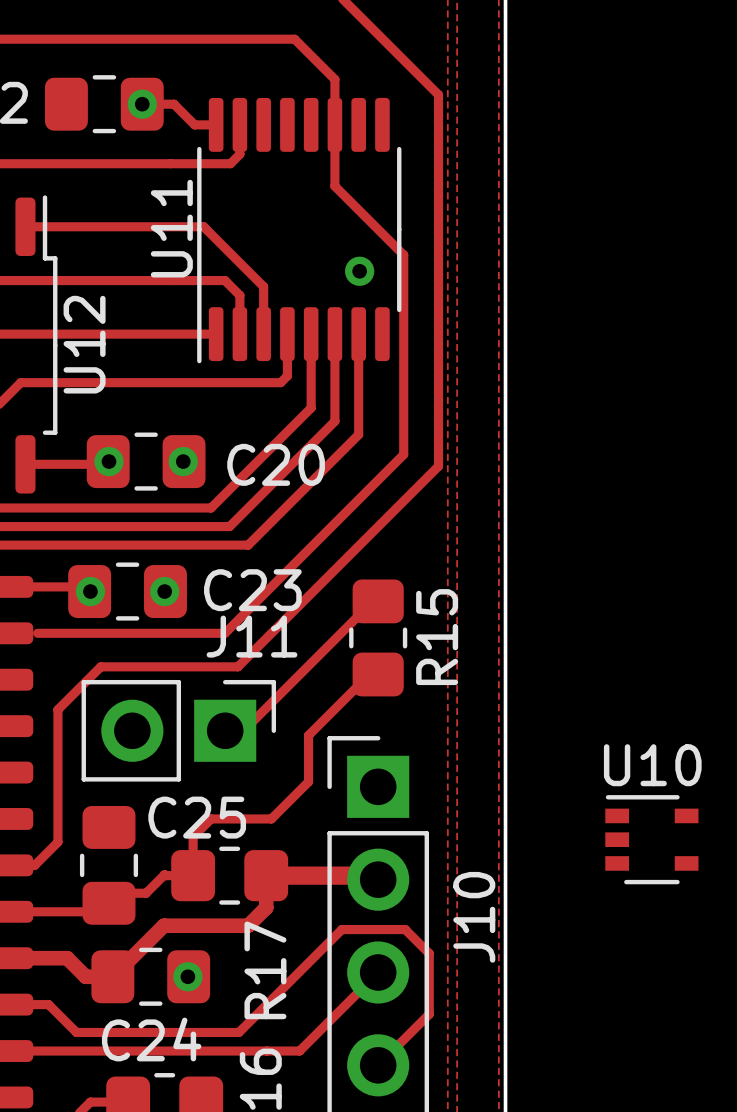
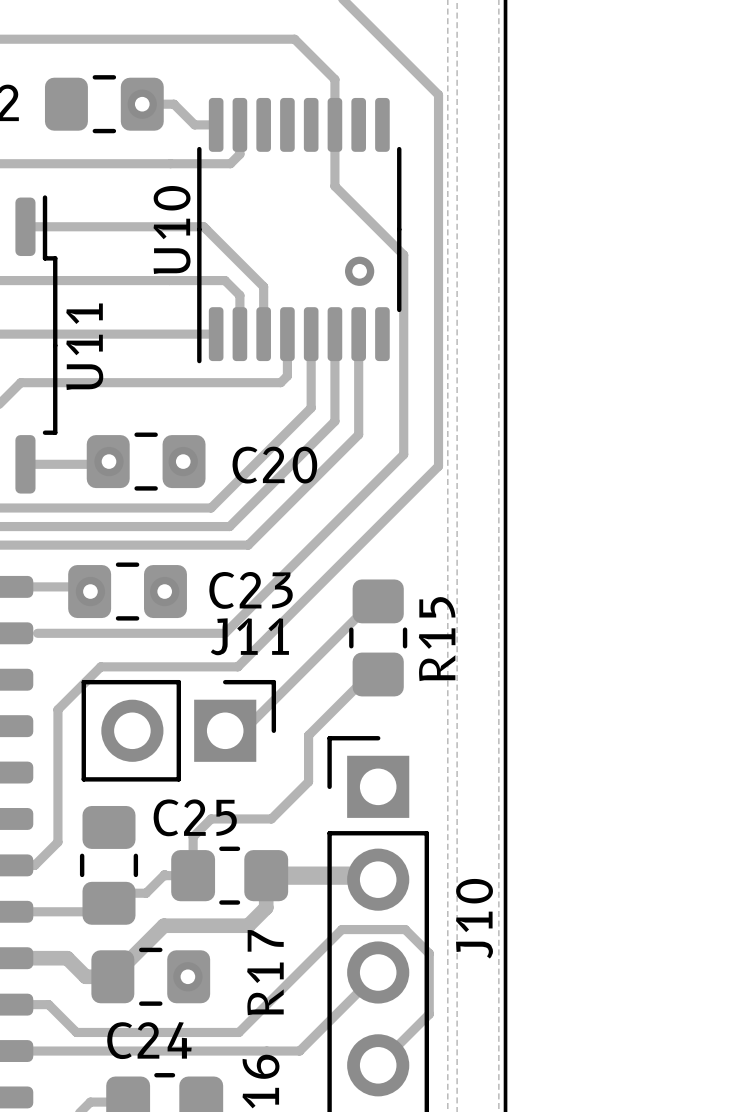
U11 name: U11 (171, 228) -> U10 (172, 229)
U12 name: U12 (84, 344) -> U11 (84, 346)
U10: (651, 839) -> none

